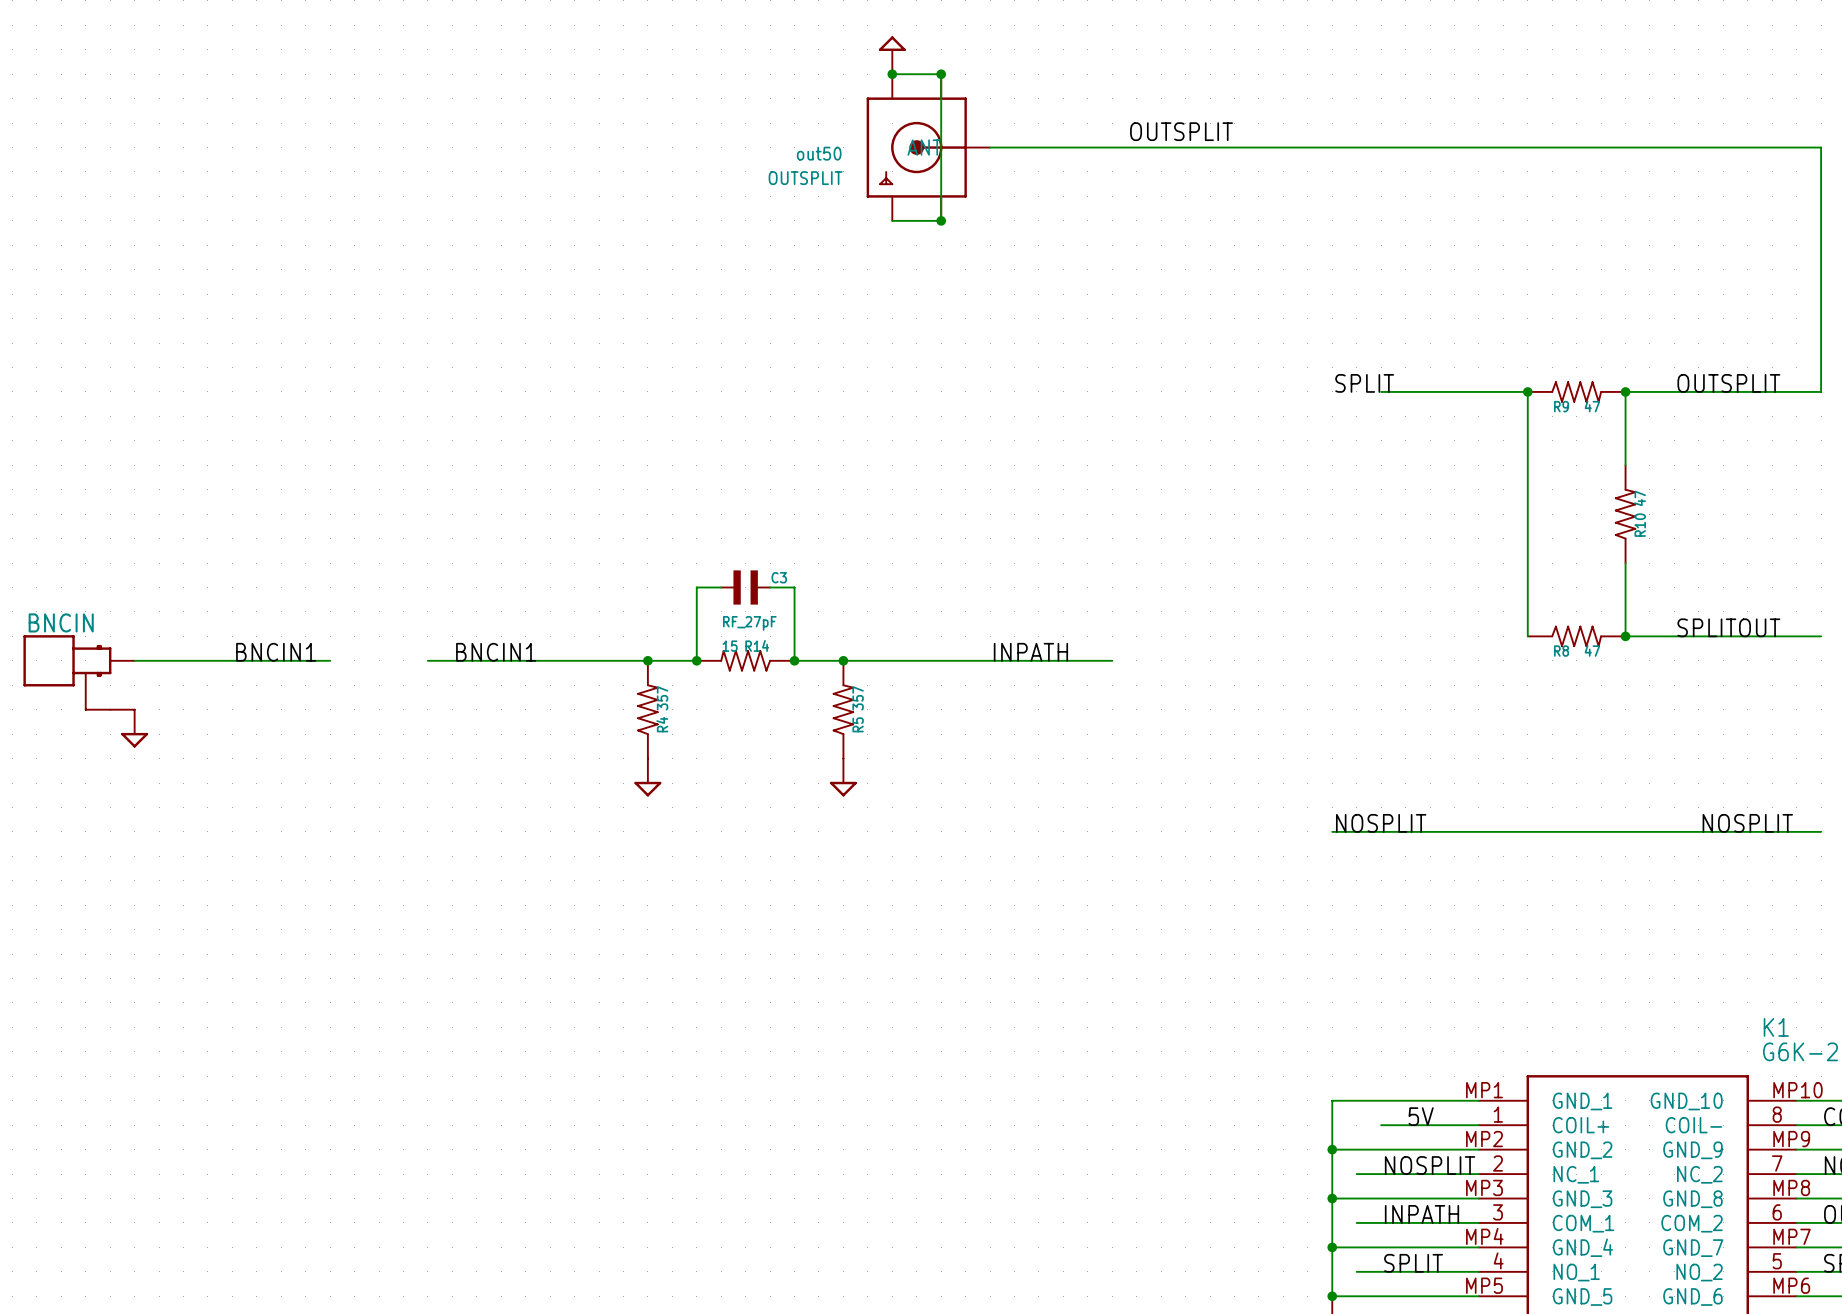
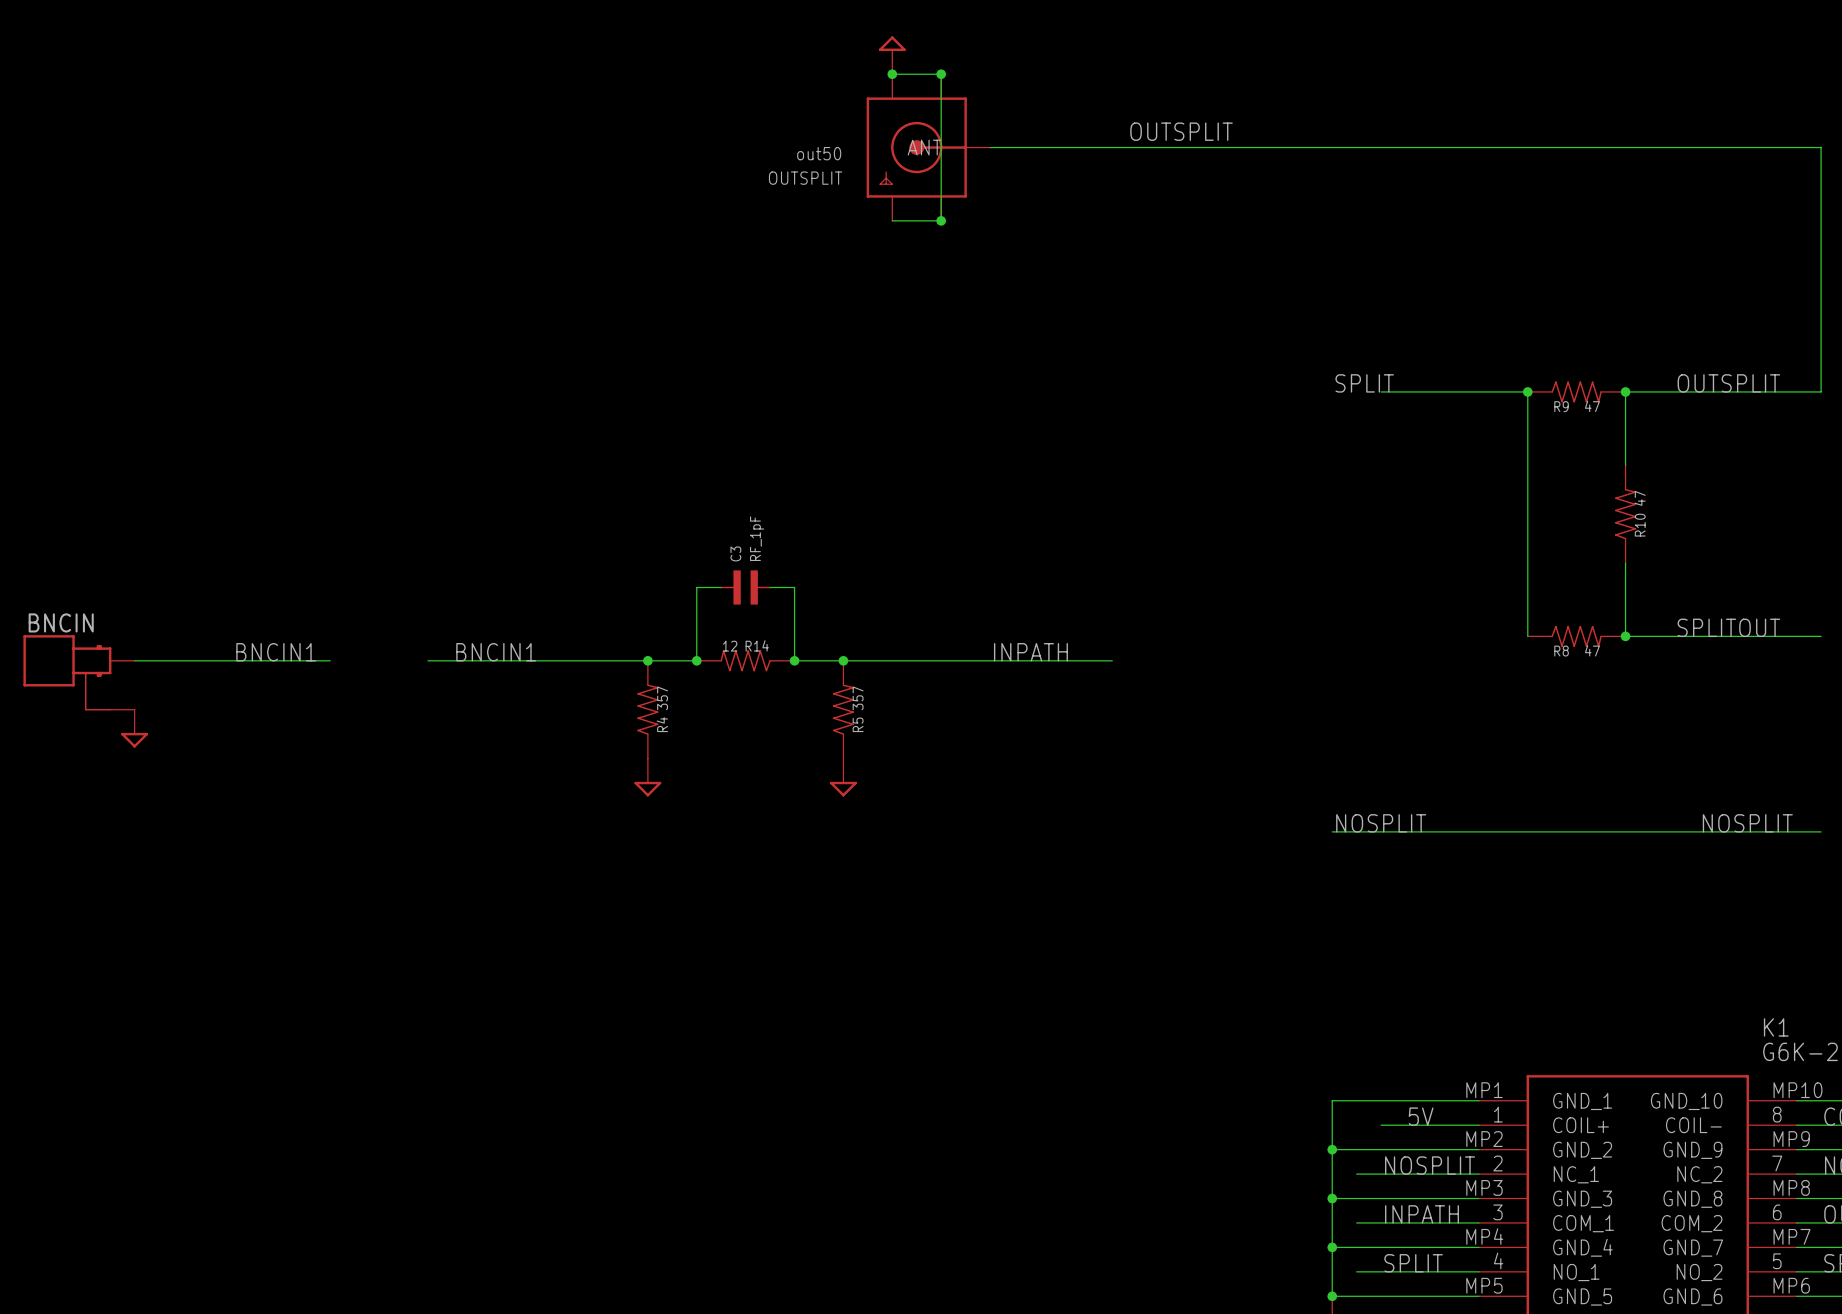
C3 name rotation: 0° (779, 577) -> 90° counterclockwise (735, 553)
C3 name position: C3 (779, 577) -> C3 (735, 553)
C3 value: RF_27pF (749, 623) -> RF_1pF (757, 538)
R14 value: 15 (730, 646) -> 12 (730, 646)

